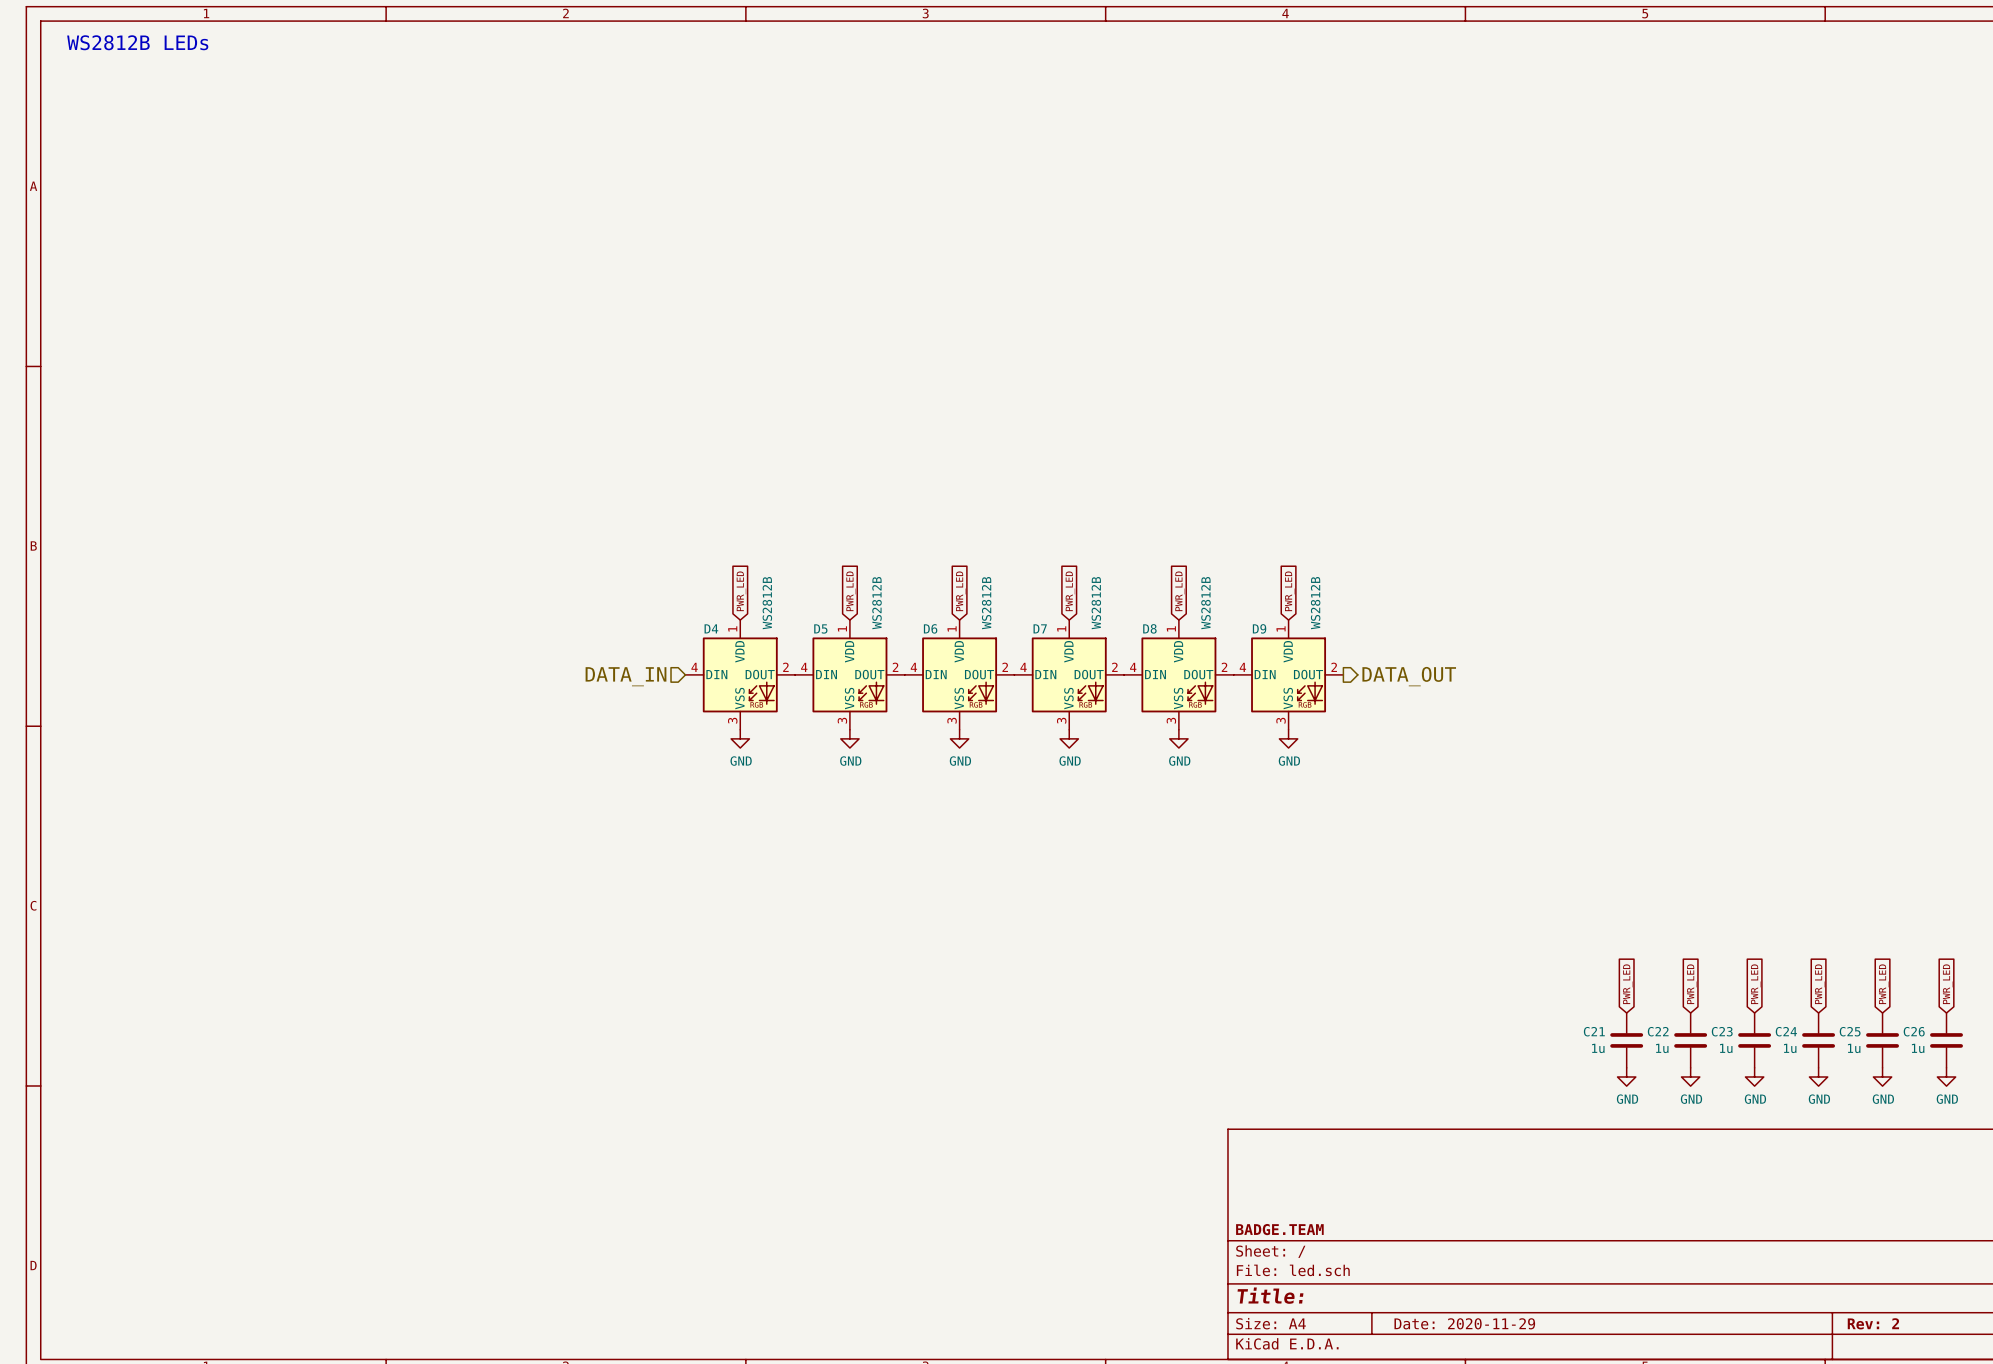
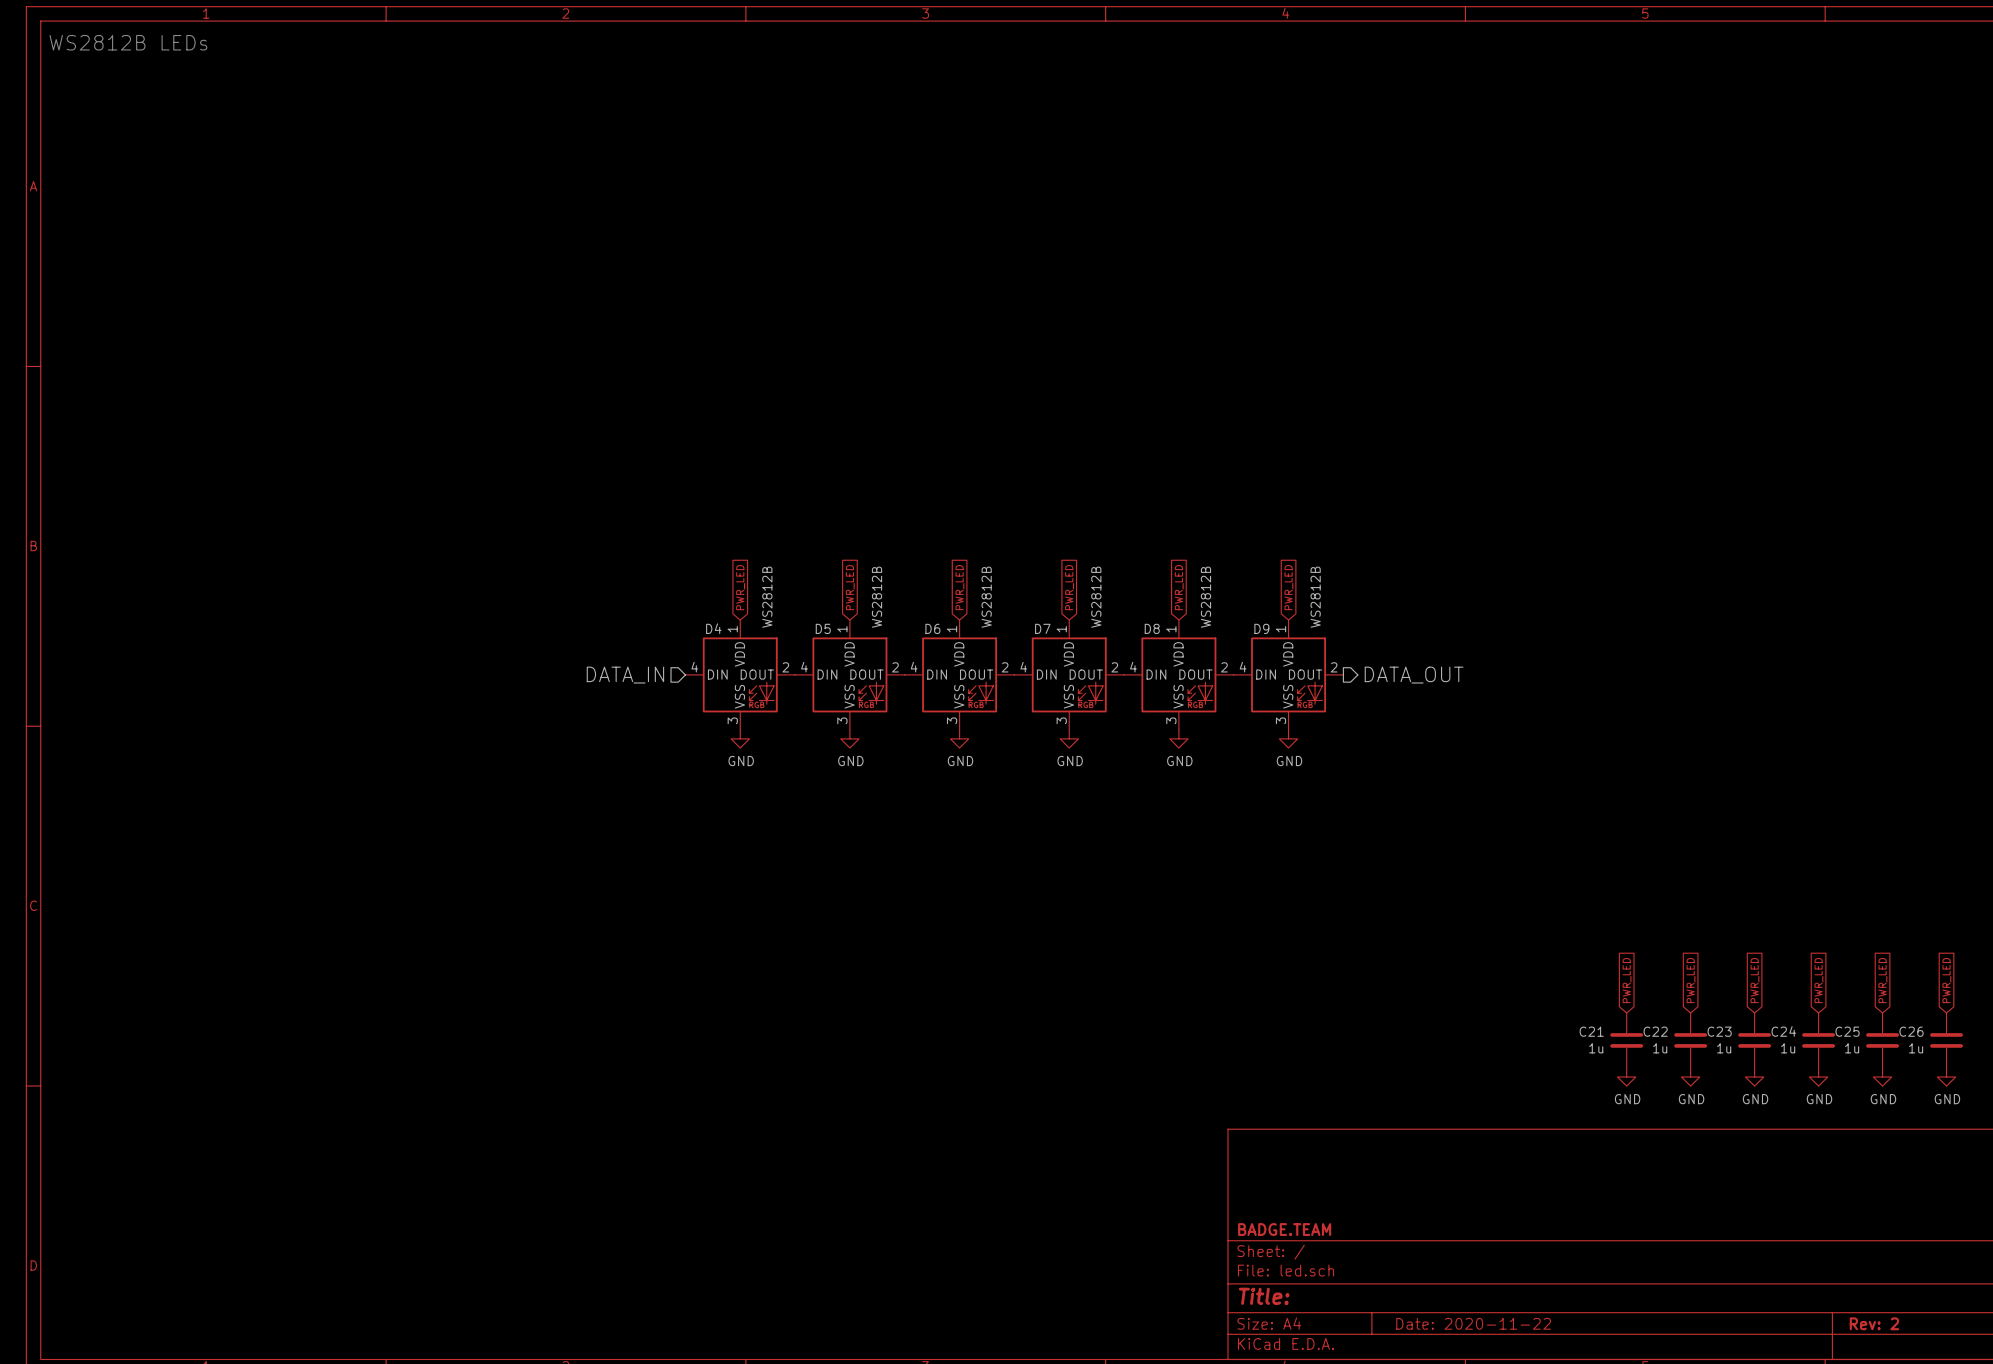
title block: Date: 2020-11-29 (1464, 1323) -> Date: 2020-11-22 (1473, 1323)

